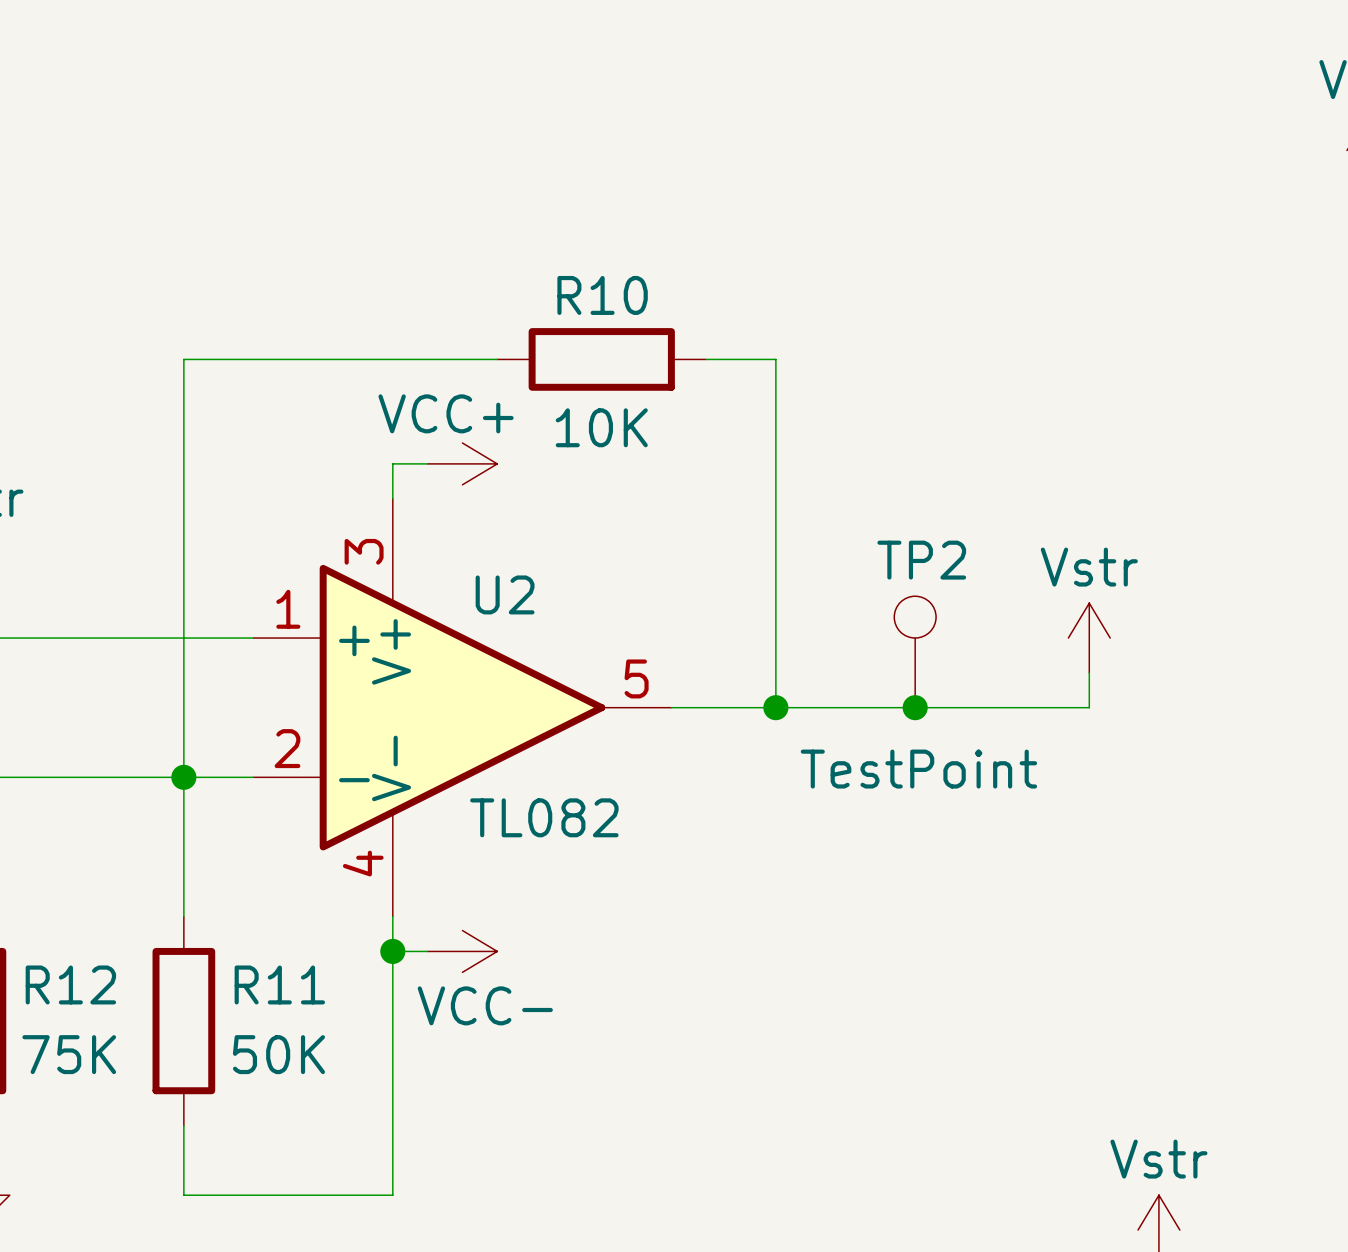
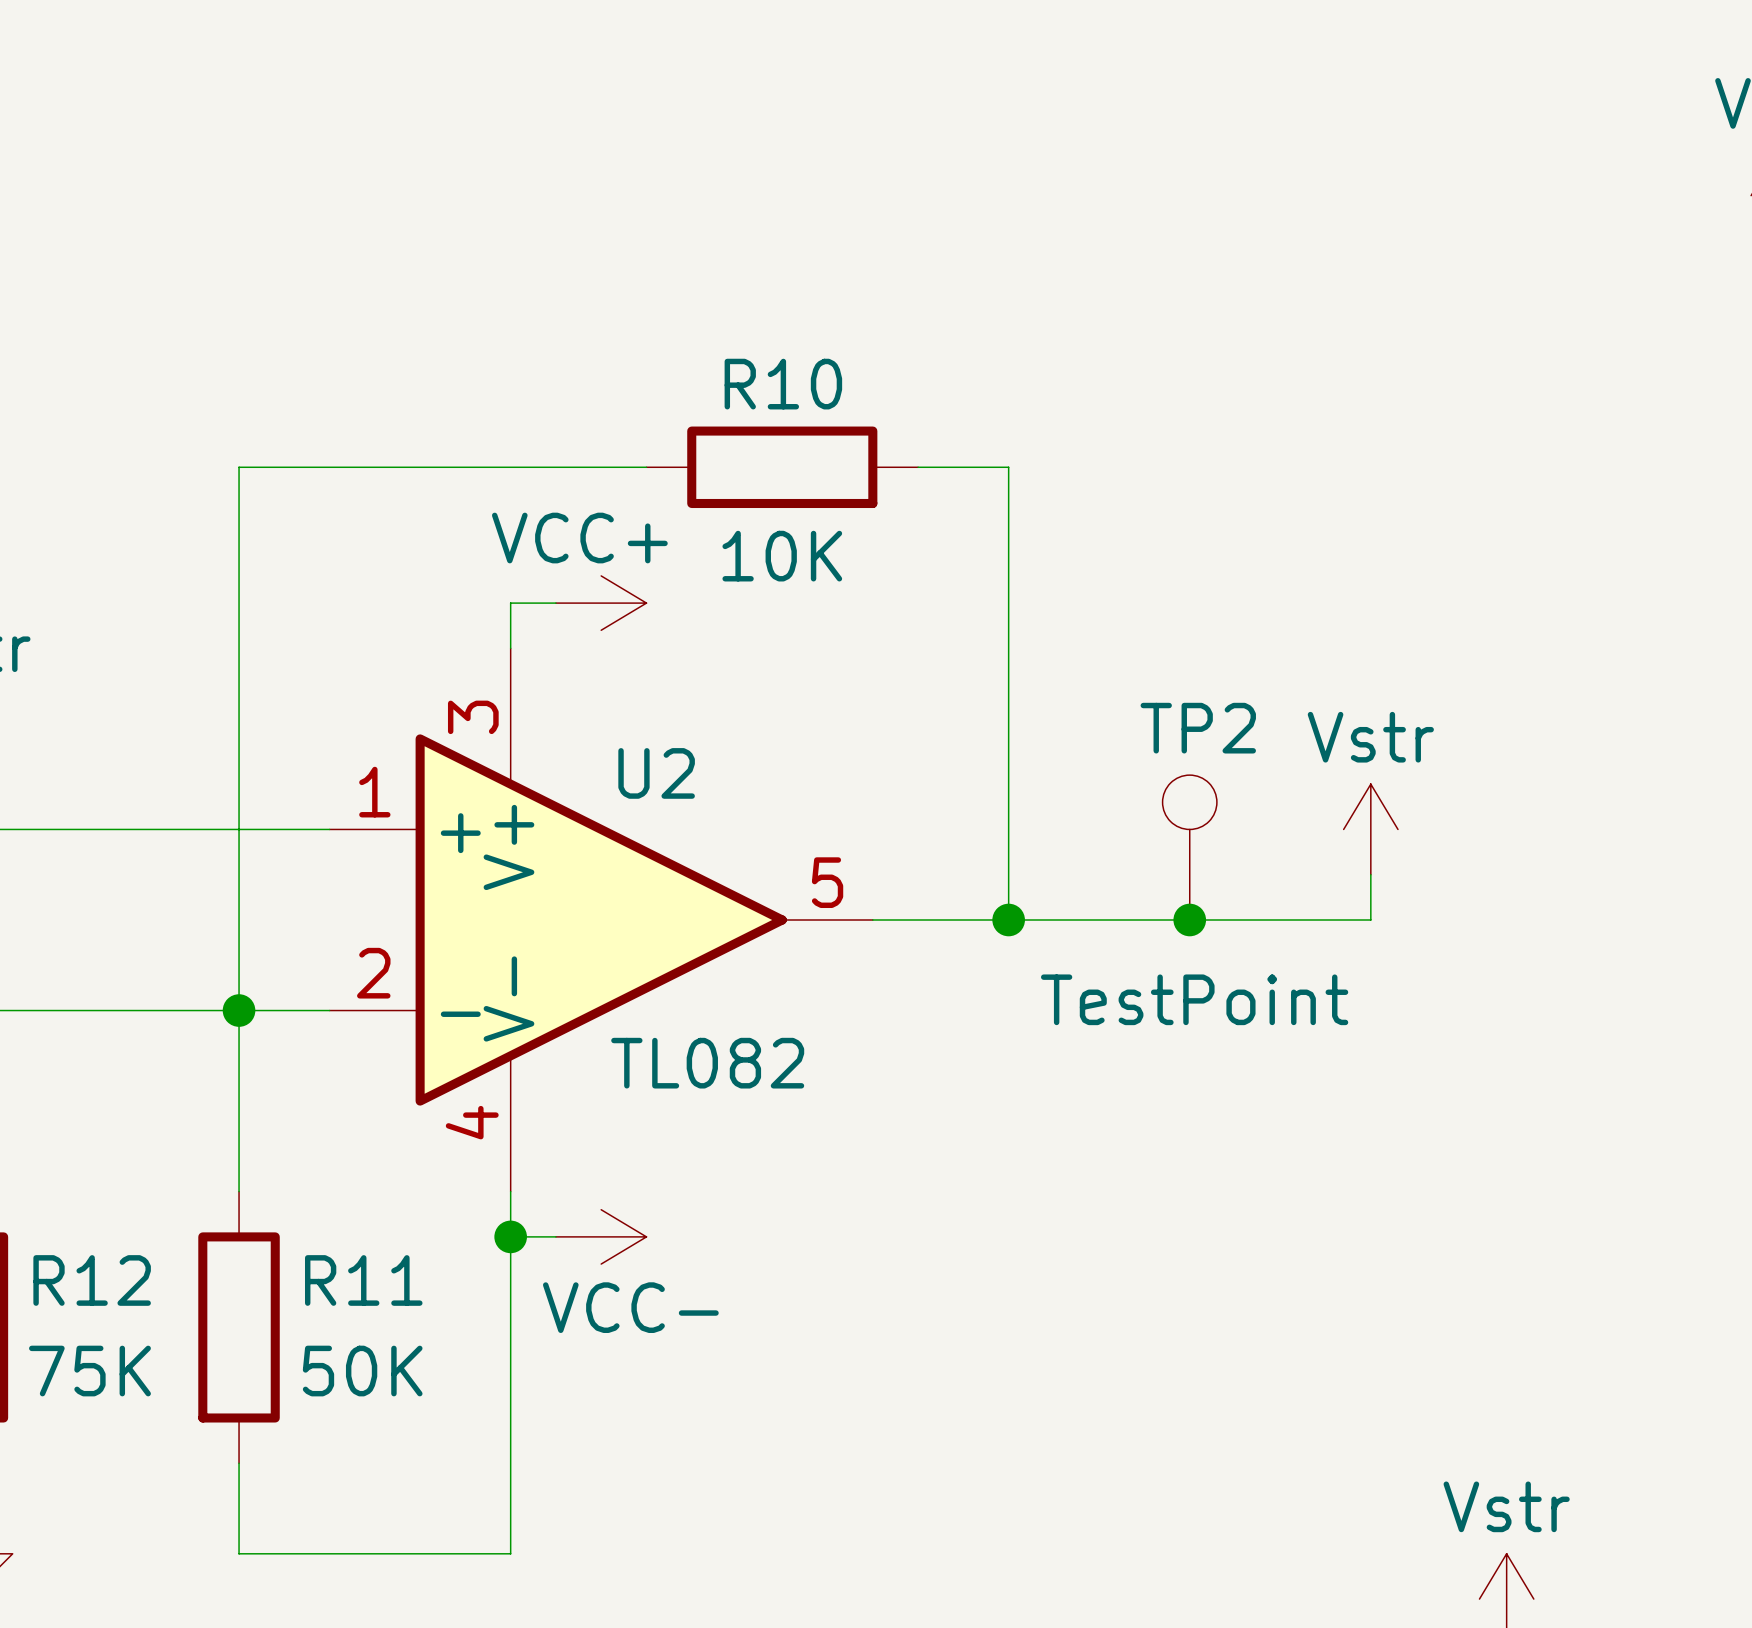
power symbol position: Vstr (1089, 638) -> Vstr (1370, 829)
wire: (1089, 672) (1089, 707) (1054, 707) -> (1370, 874) (1370, 919)

